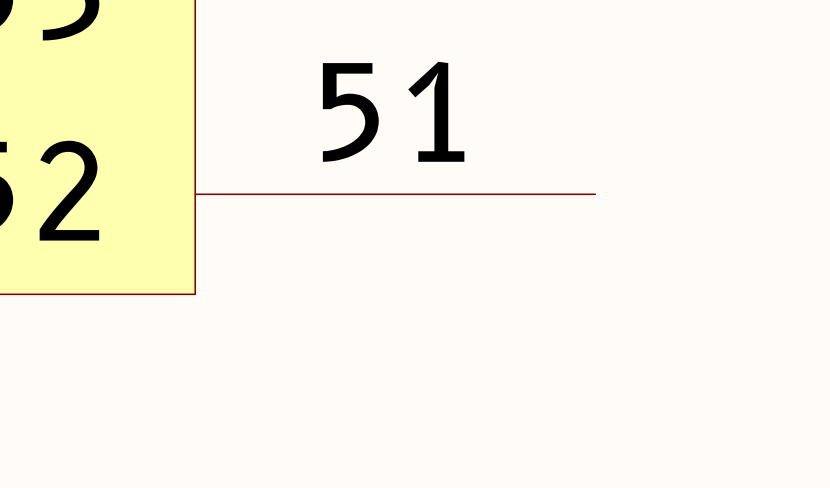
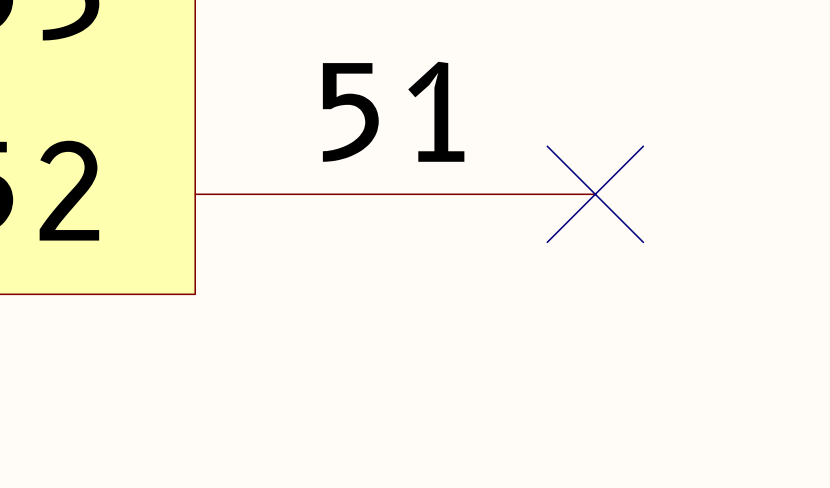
no-connect mark: none -> (595, 194)

